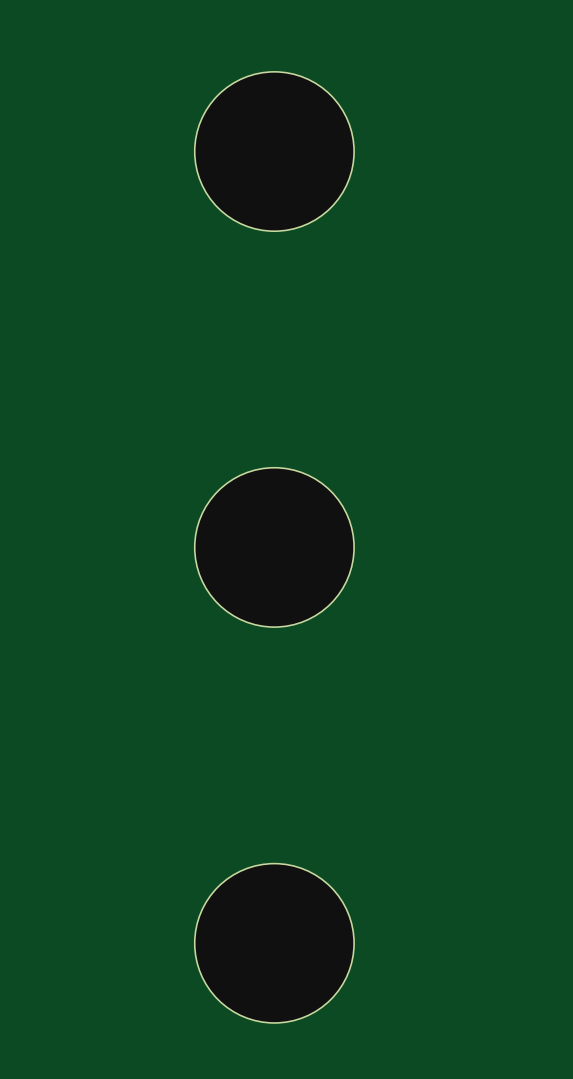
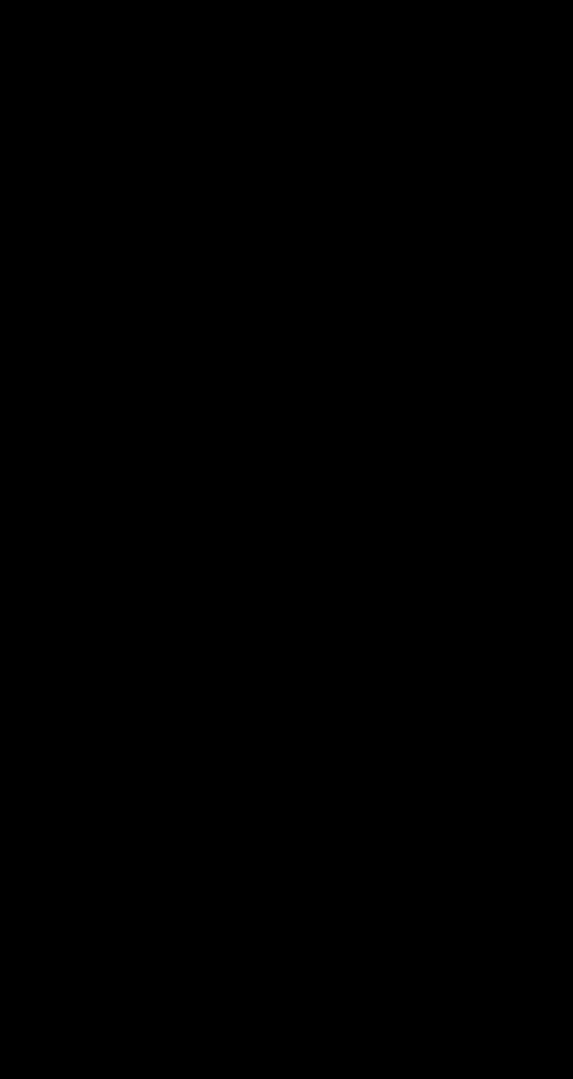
part: (274, 151) -> none
part: (274, 547) -> none
part: (274, 943) -> none

